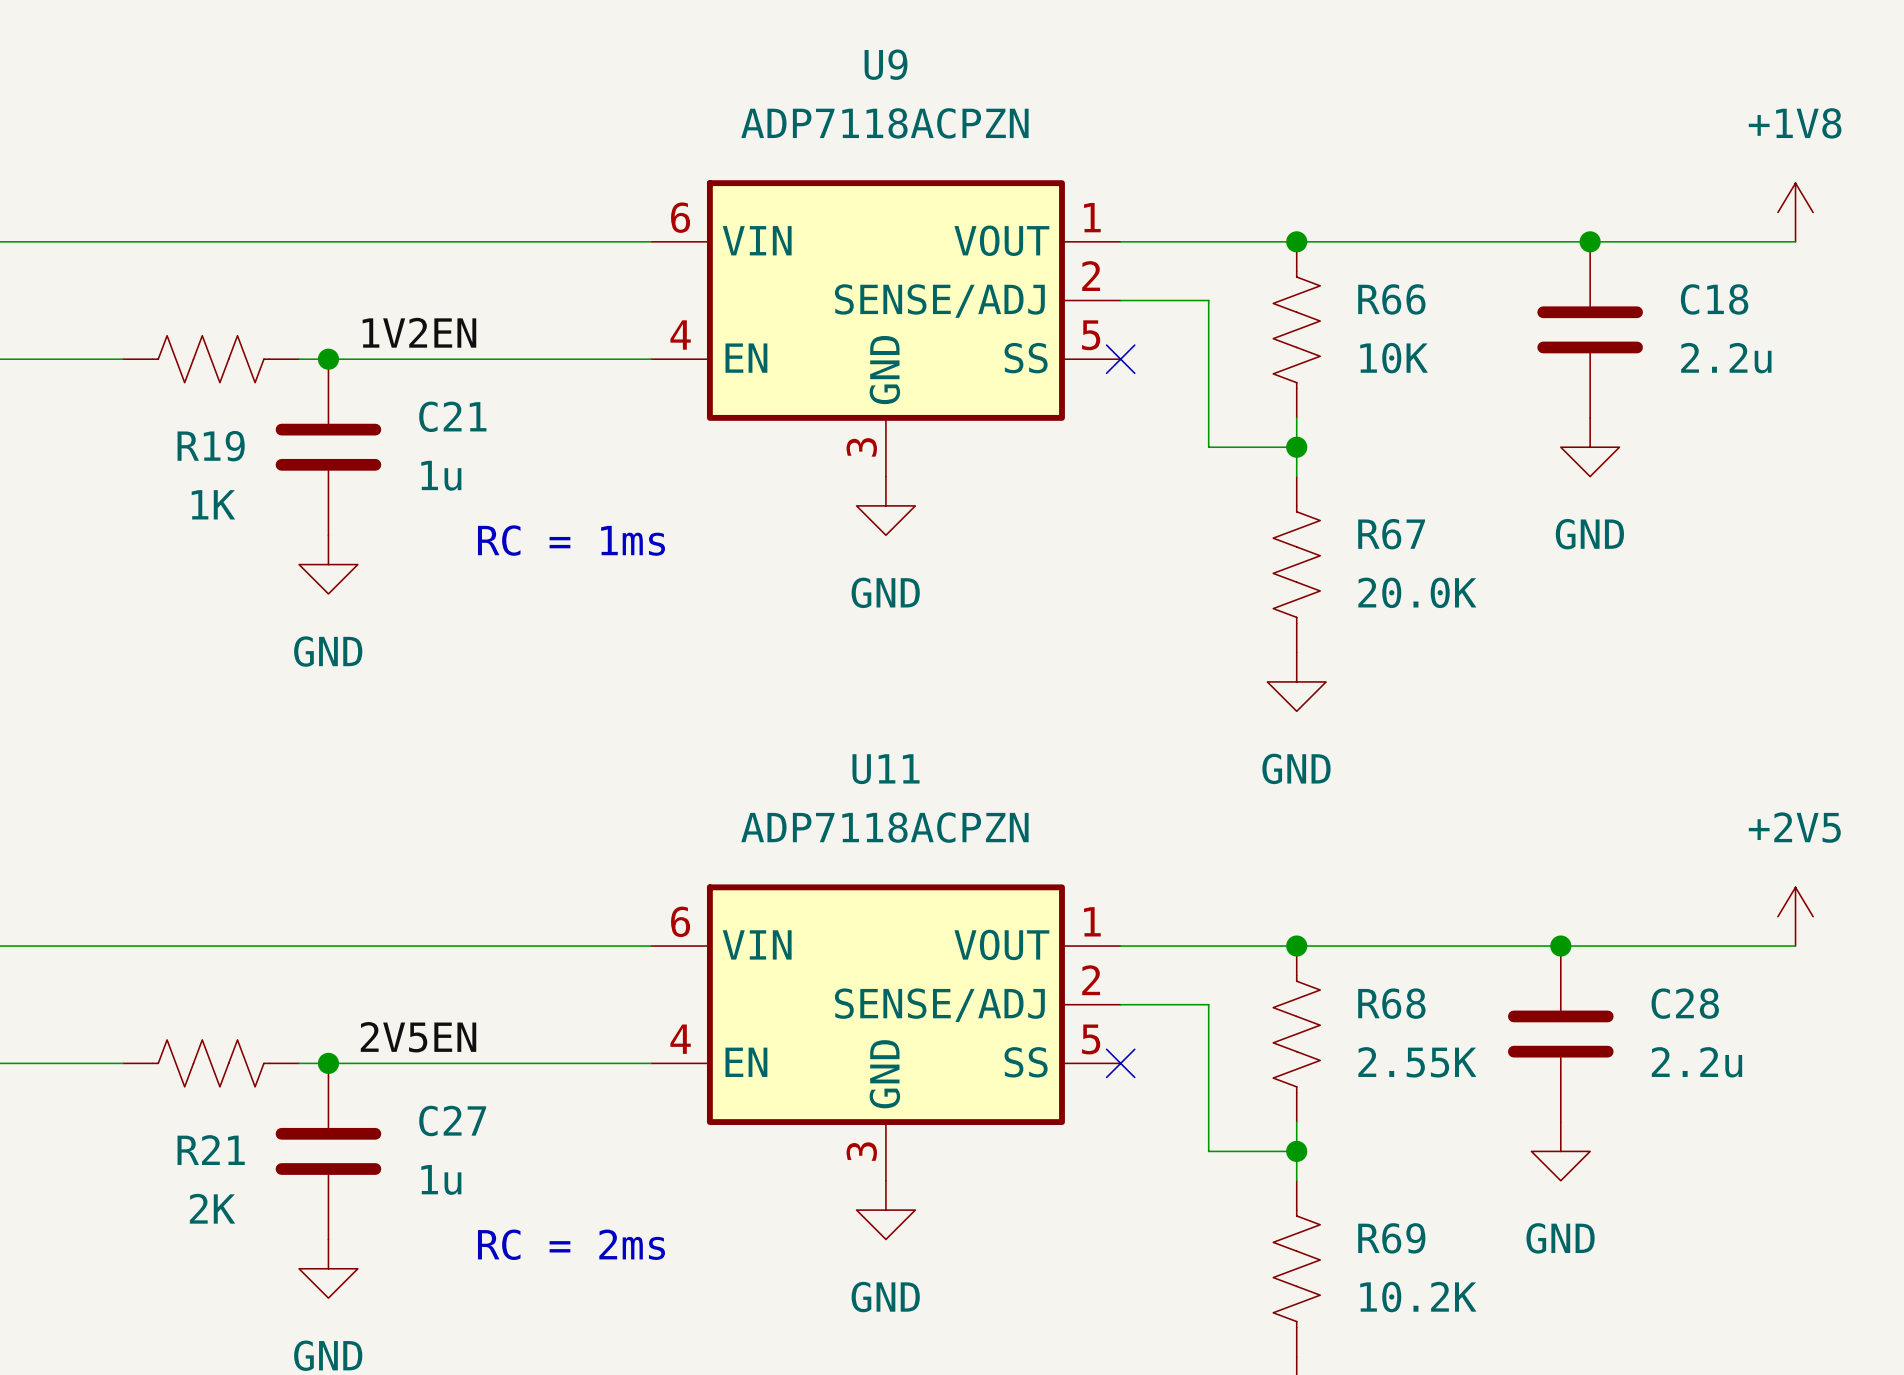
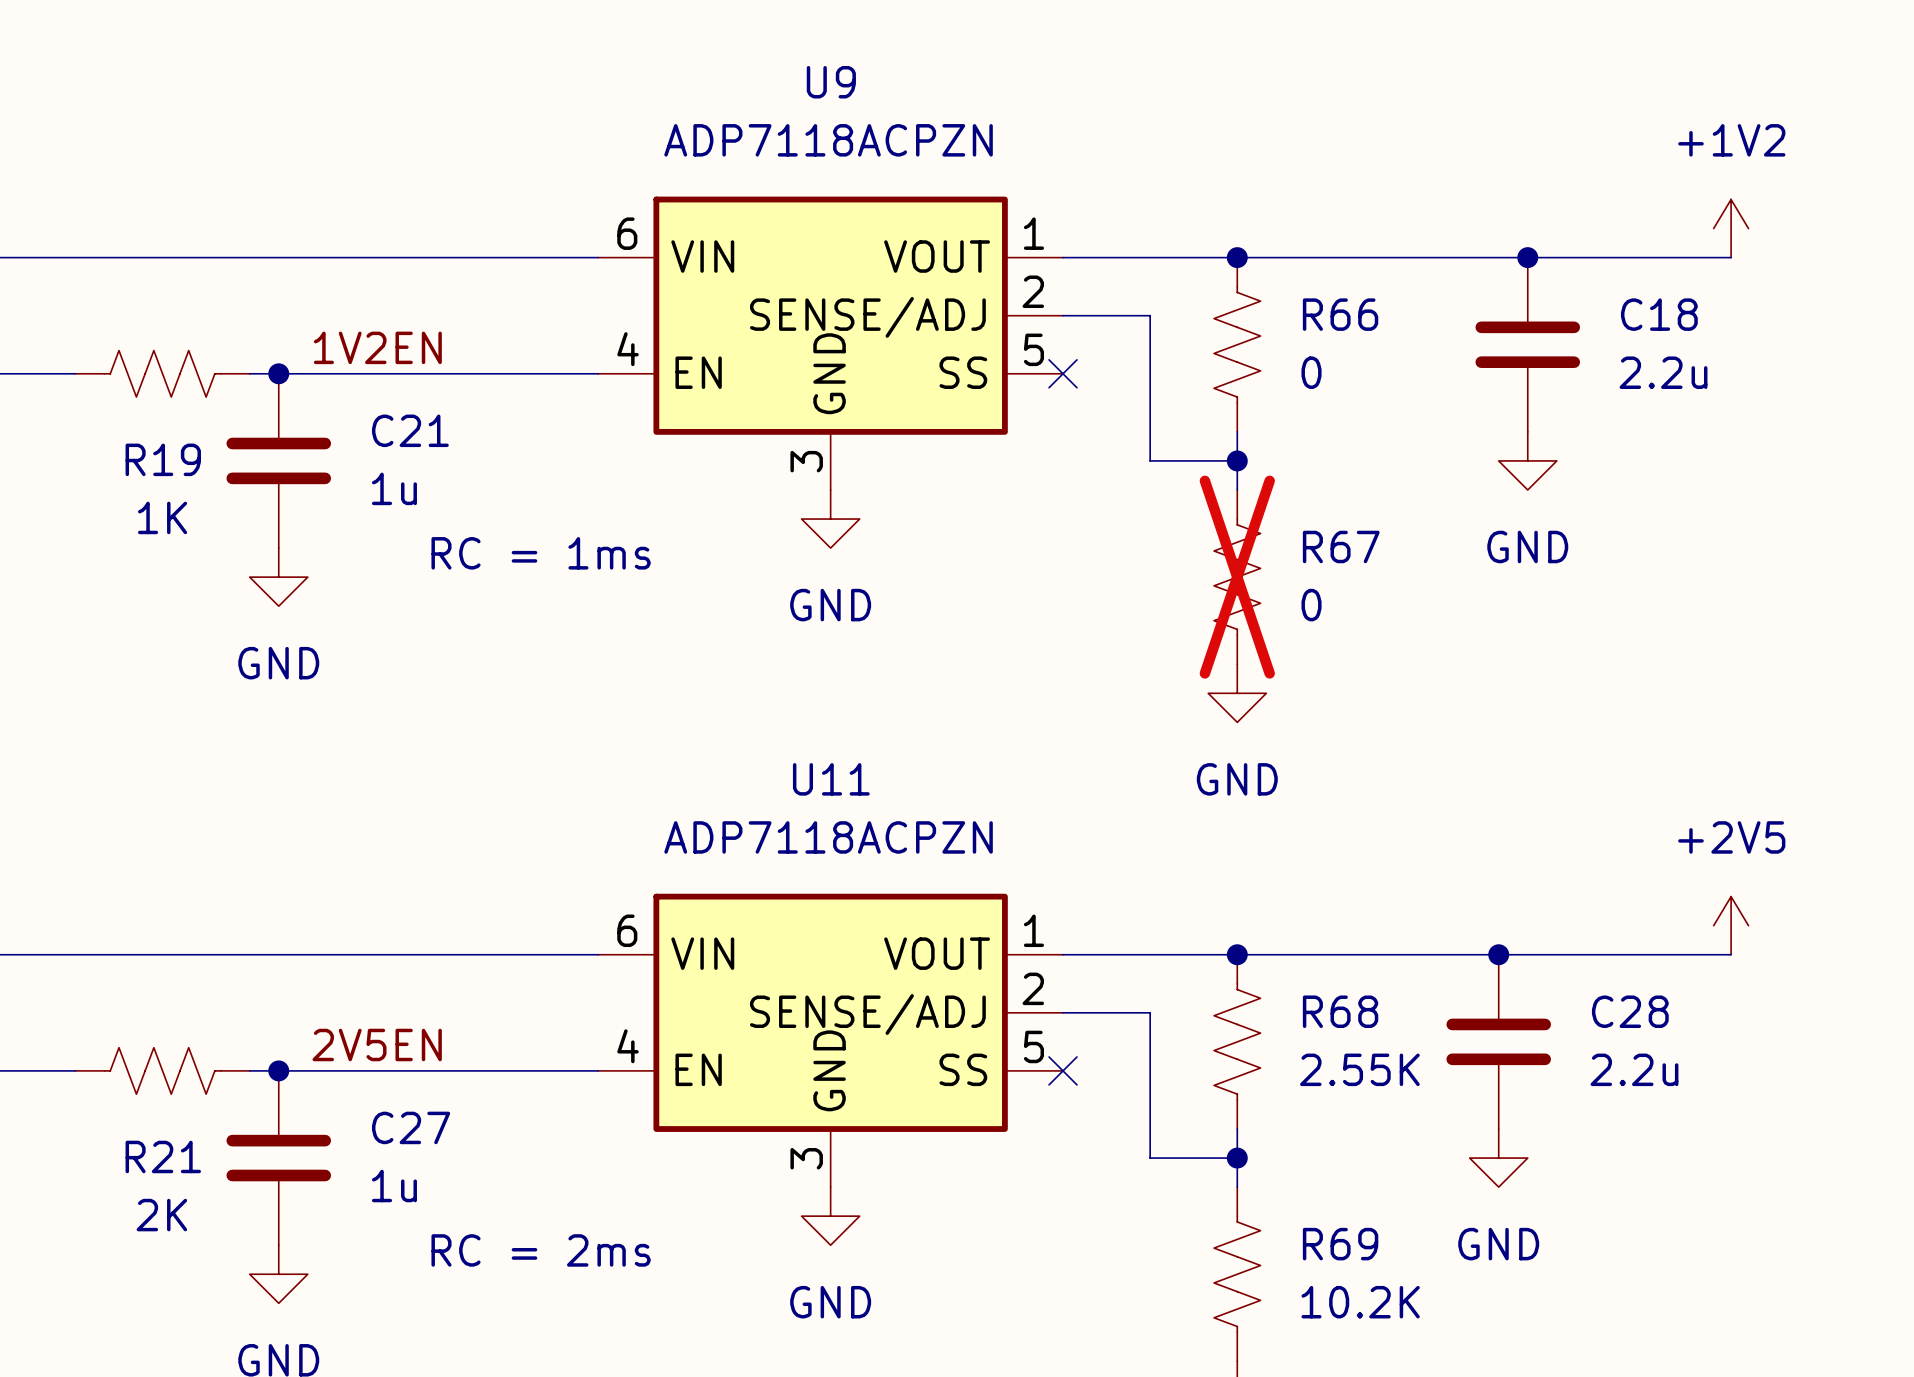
power symbol: +1V8 (1795, 212) -> +1V2 (1731, 228)
R66 value: 10K (1394, 358) -> 0 (1311, 372)
R67 do-not-place cross: none -> (1237, 577)
R67 value: 20.0K (1417, 592) -> 0 (1311, 605)

